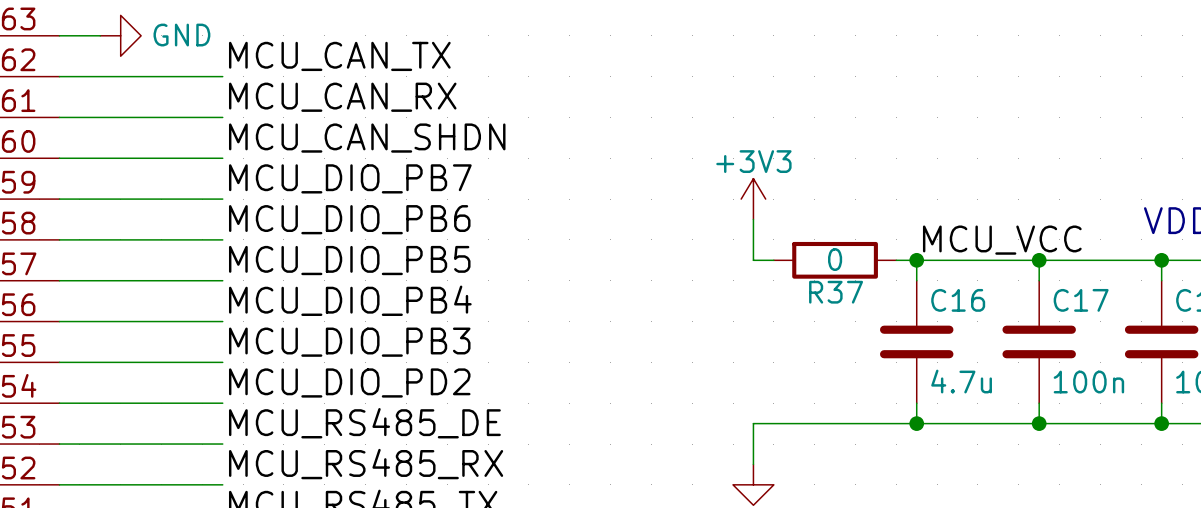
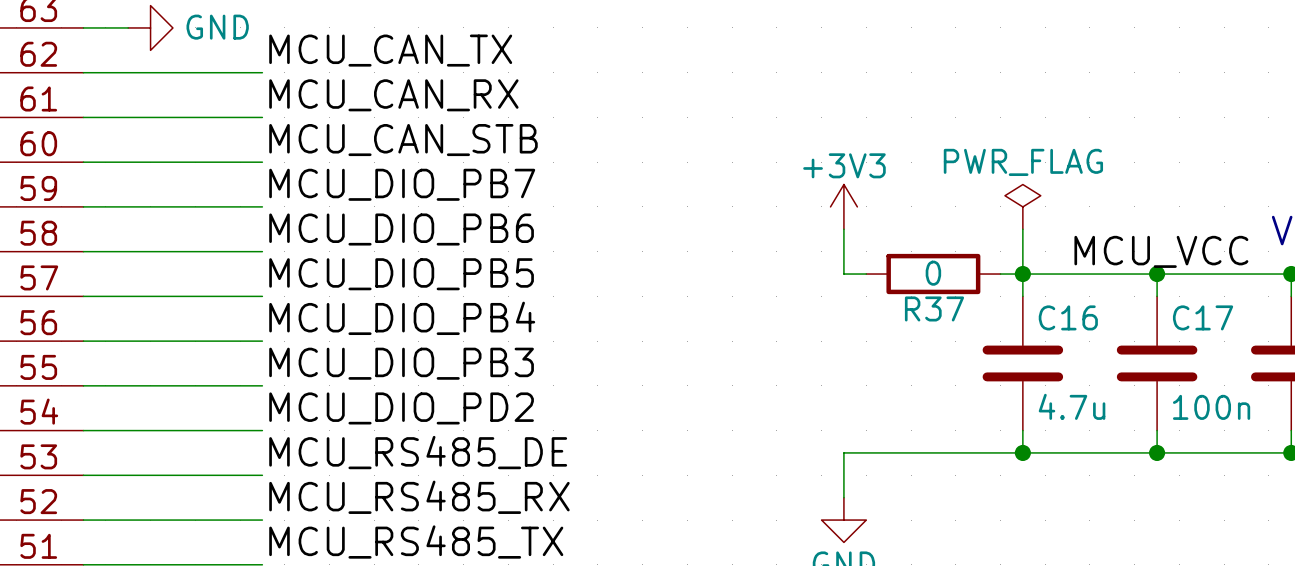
label: MCU_CAN_SHDN (367, 138) -> MCU_CAN_STB (403, 140)
power symbol: none -> PWR_FLAG (1022, 206)
wire: none -> (1022, 229) (1022, 274)
label position: MCU_VCC (1002, 240) -> MCU_VCC (1161, 251)

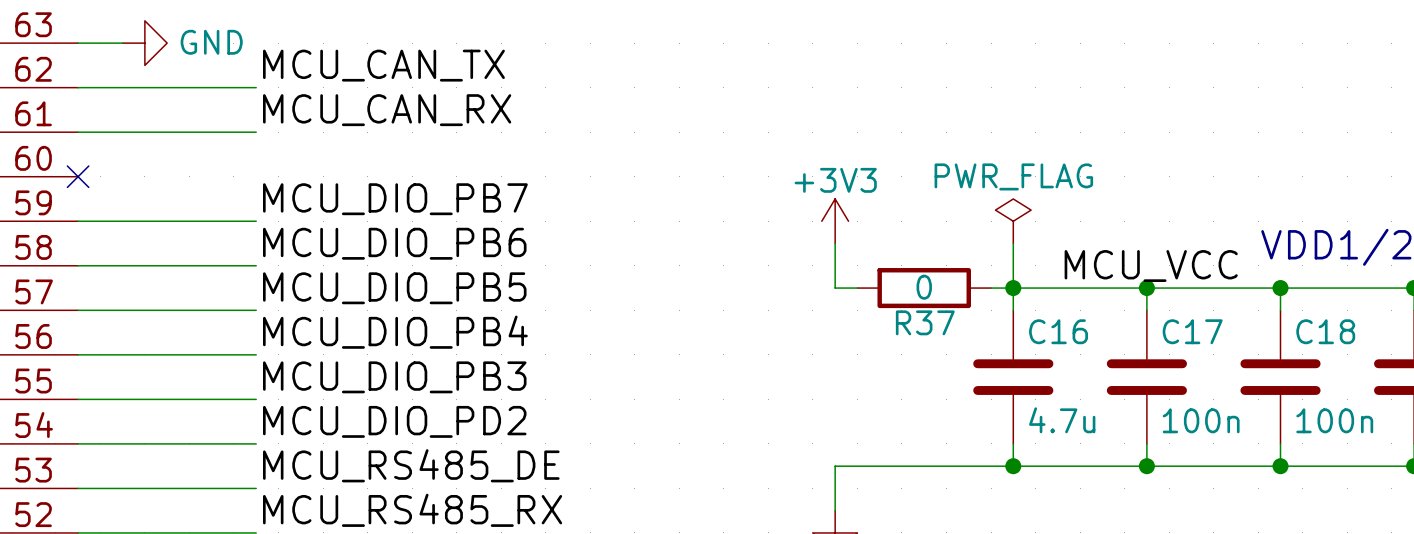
label: MCU_CAN_STB (403, 140) -> none
wire: (83, 162) (262, 162) -> none
no-connect mark: none -> (78, 176)

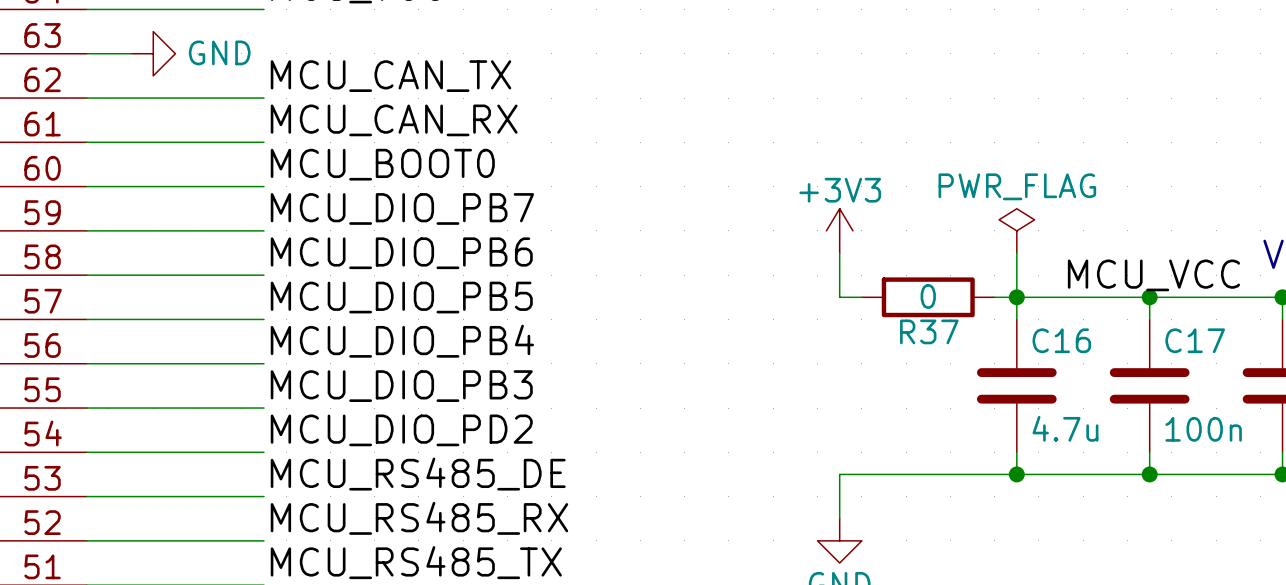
label: none -> MCU_BOOT0 (382, 164)
wire: none -> (86, 186) (263, 186)
no-connect mark: (78, 176) -> none

